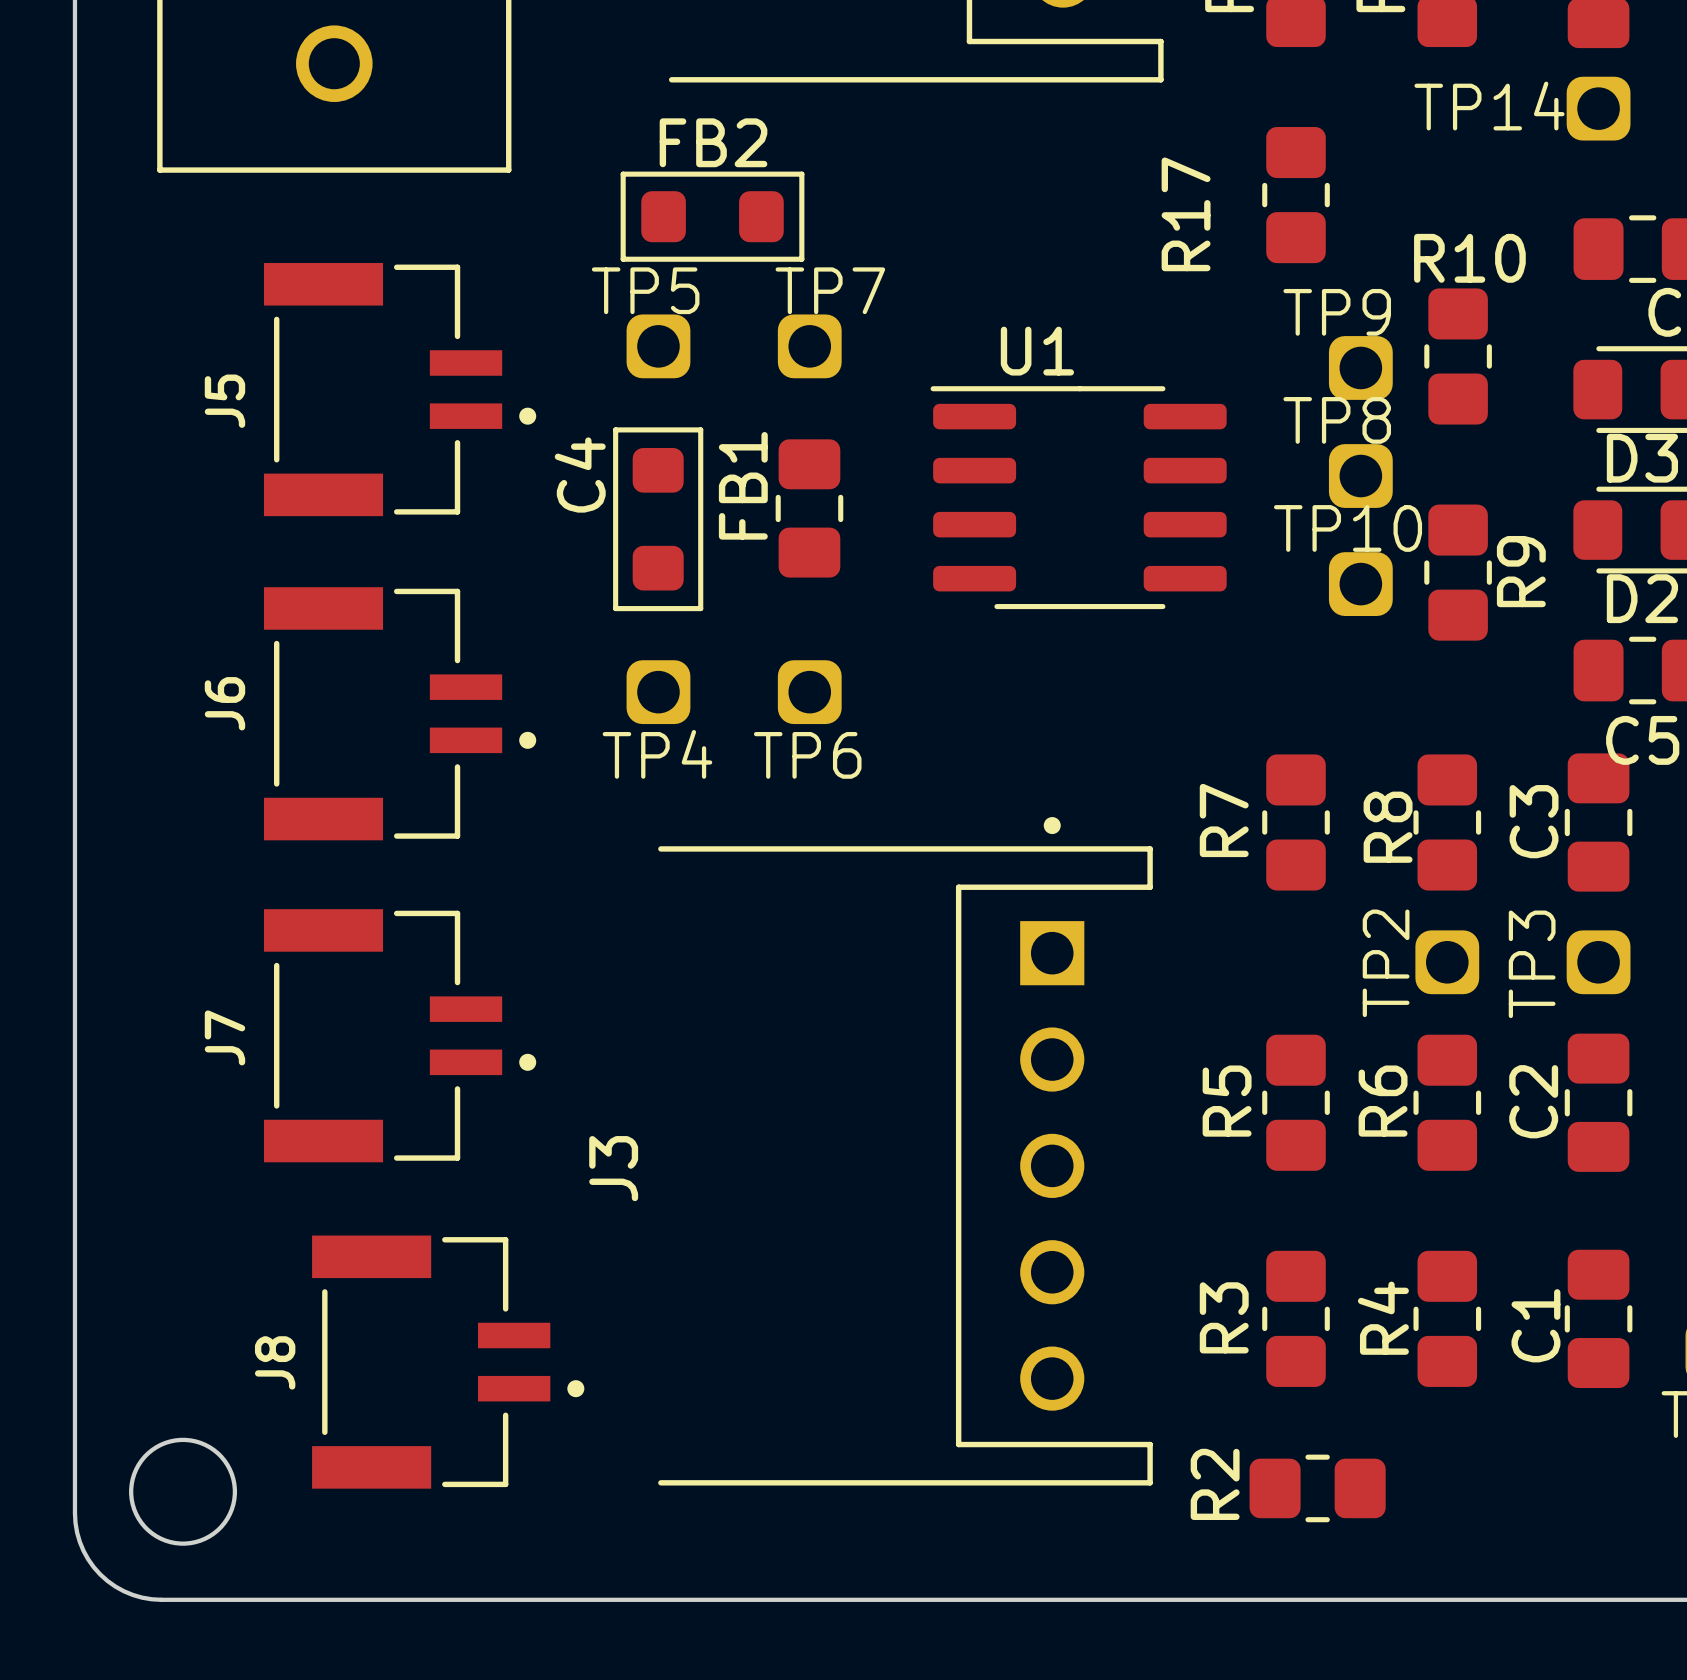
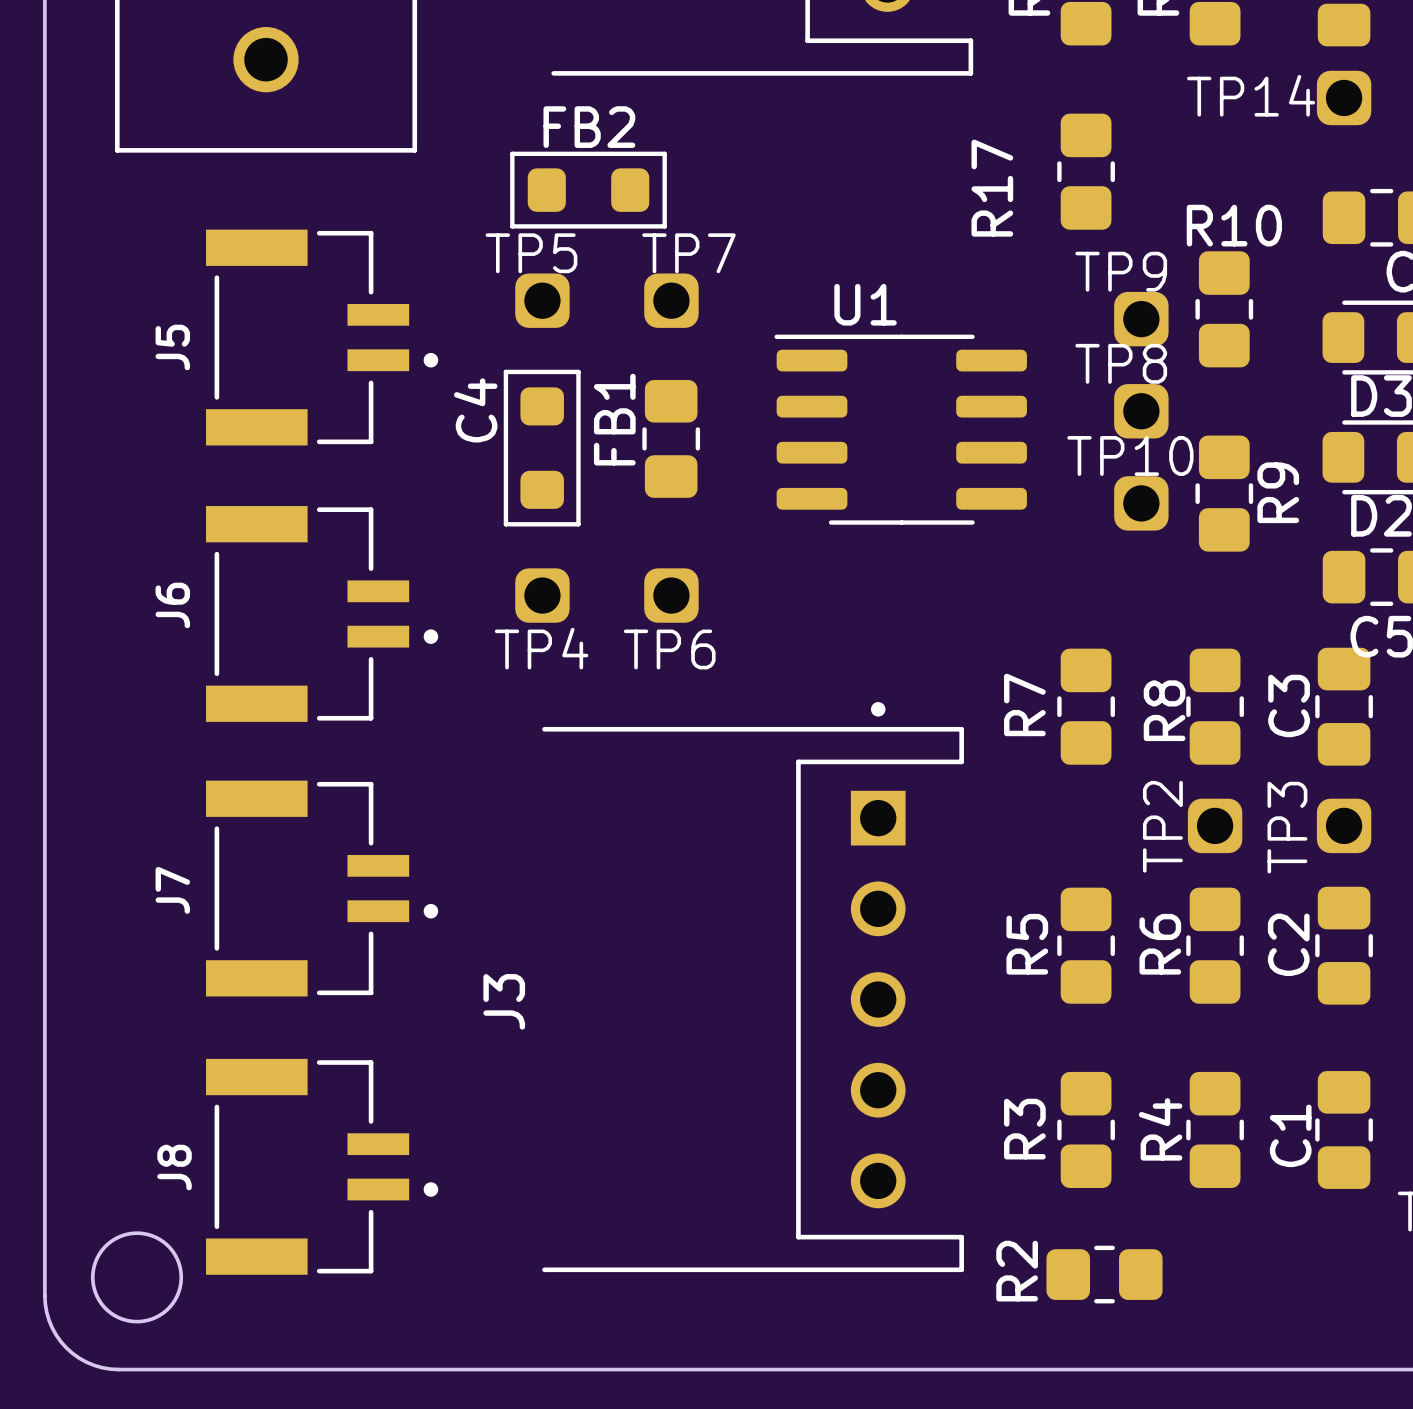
J8 position: (448, 1362) -> (322, 1166)

